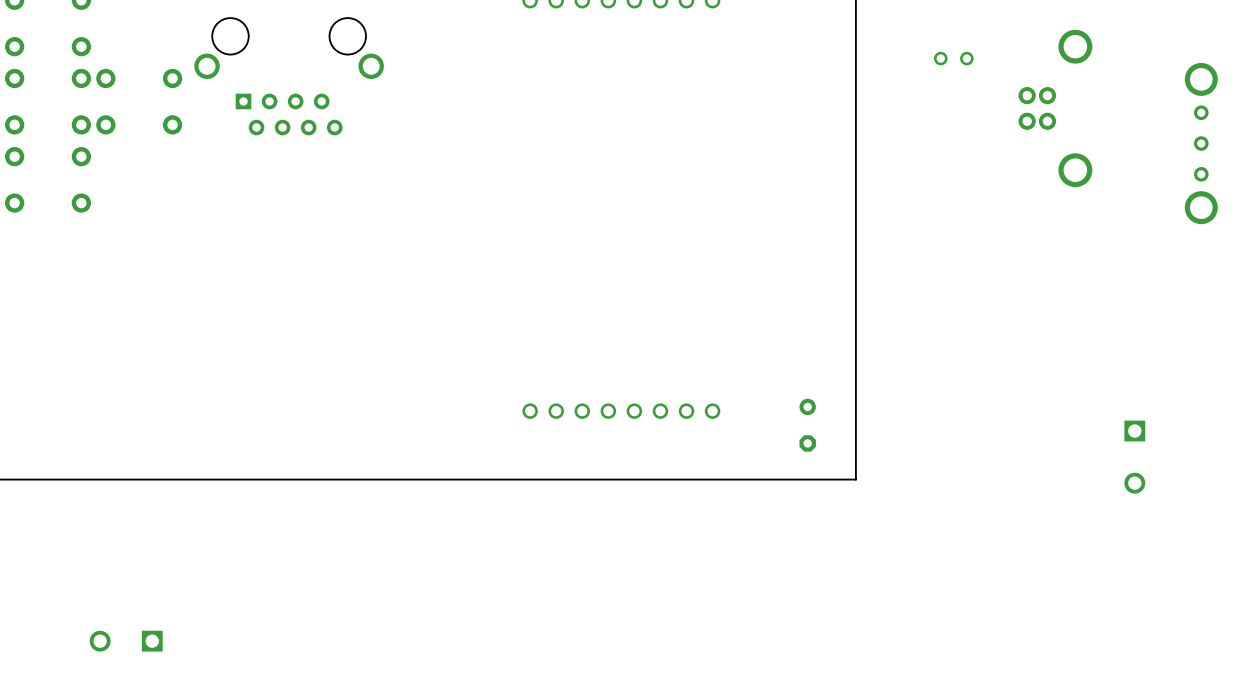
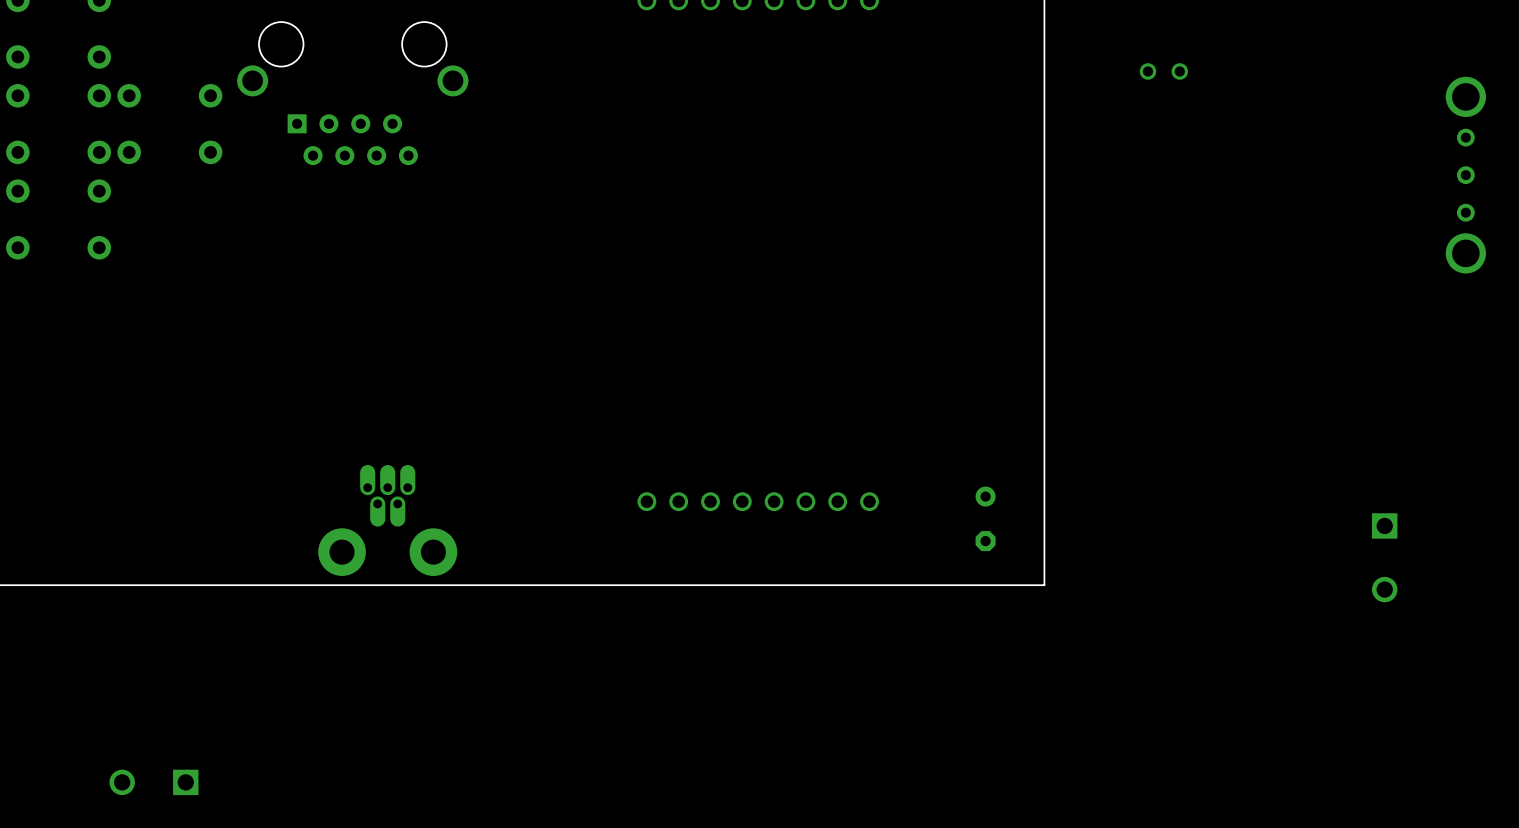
part: (1055, 108) -> none
part: none -> (387, 520)

